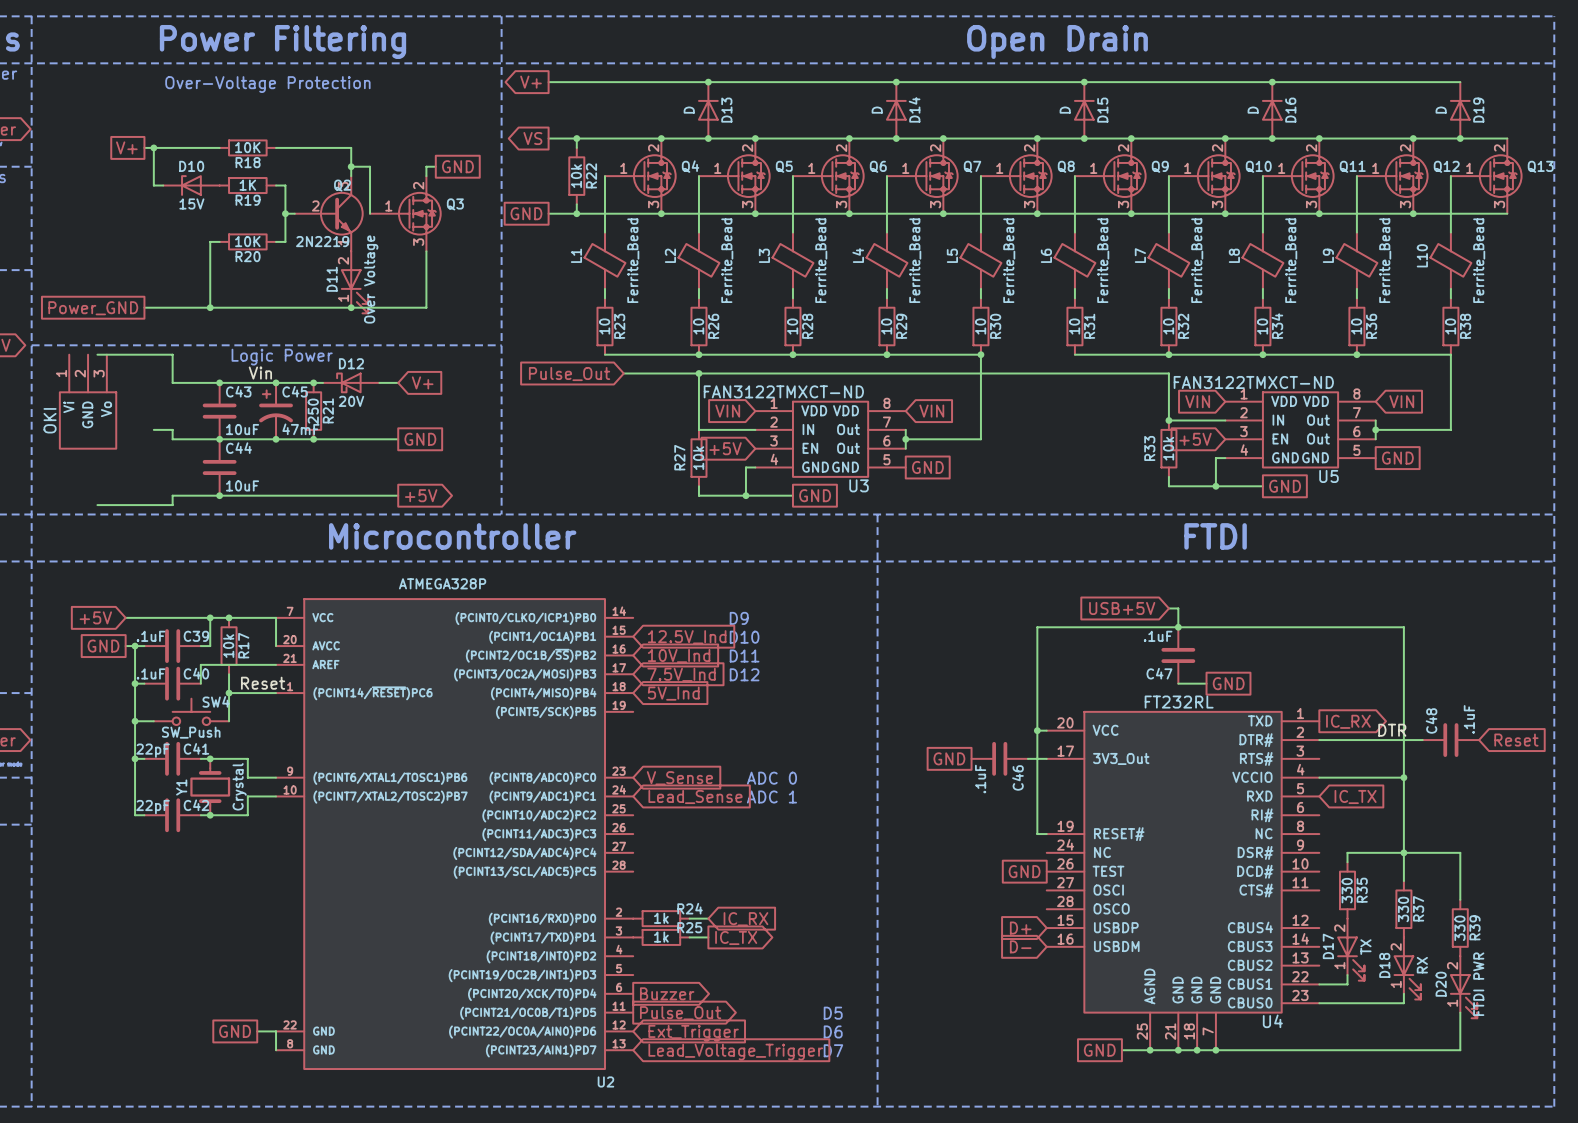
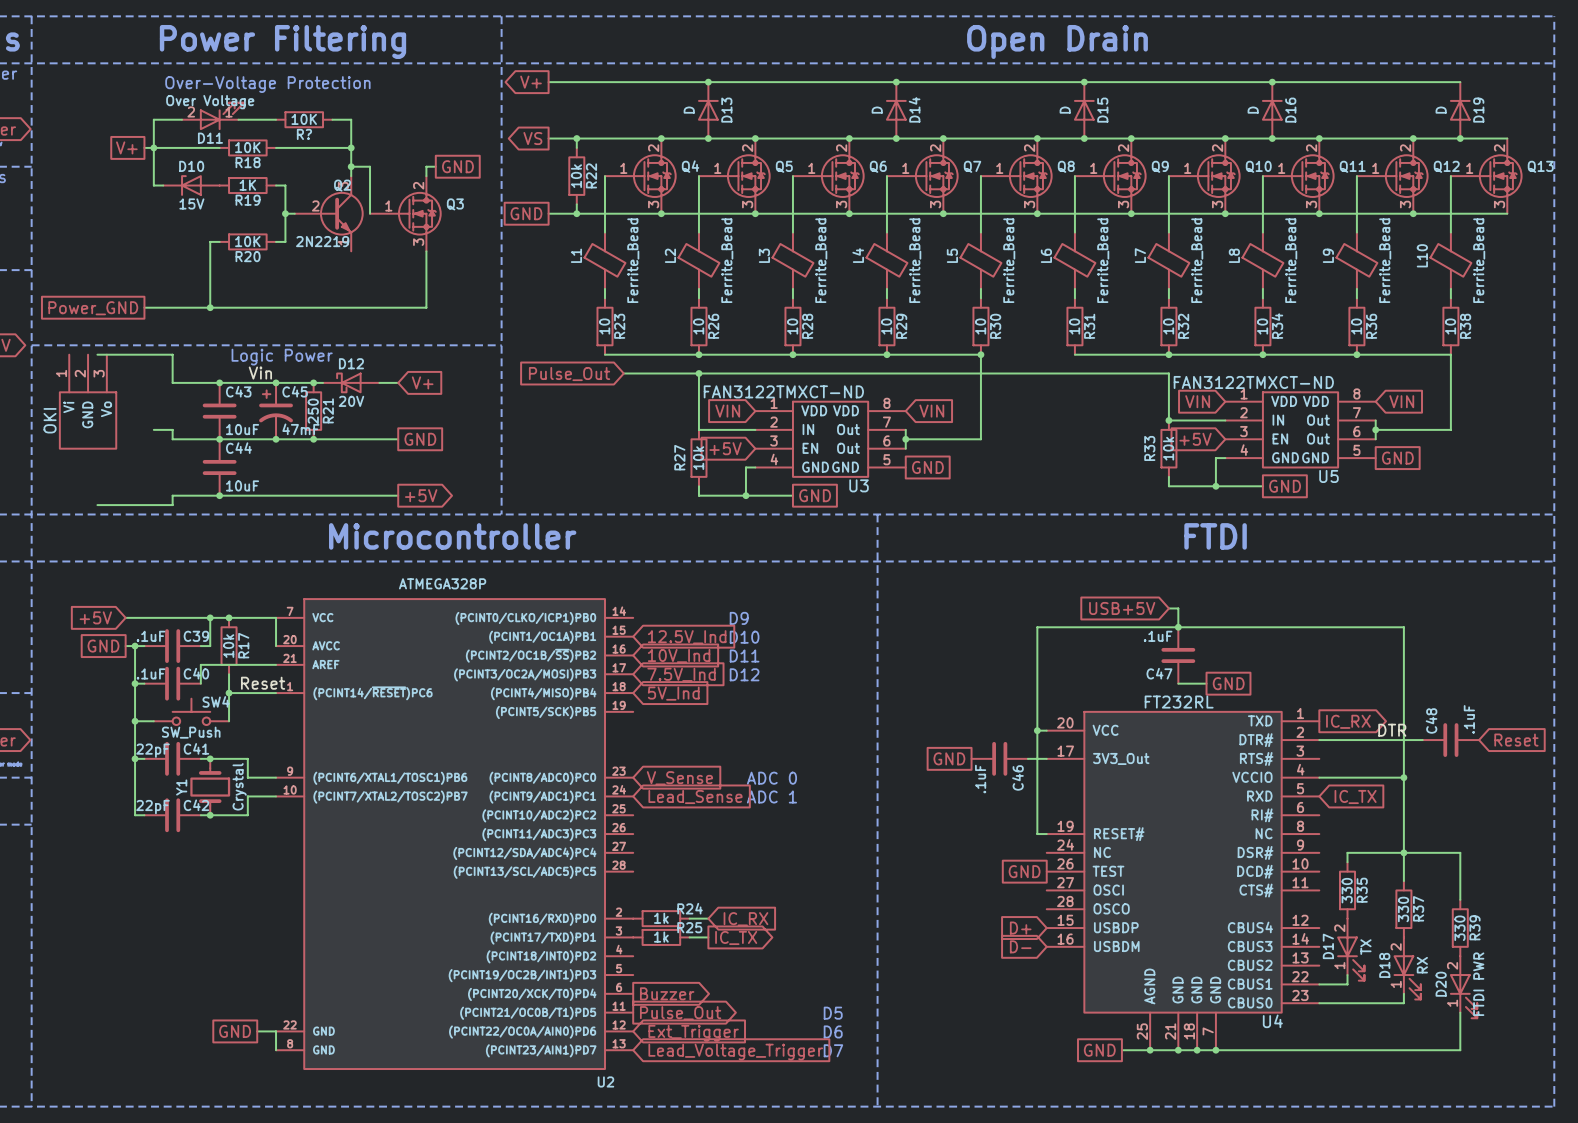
wire: none -> (182, 119) (153, 119) (153, 147)
wire: none -> (238, 119) (276, 119)
R?: none -> 10K (304, 119)
wire: none -> (332, 119) (351, 119) (351, 147)
junction: none -> (351, 147)
D11 position: (354, 282) -> (213, 116)
D11 rotation: 0° (354, 291) -> 90° counterclockwise (222, 116)
junction: (351, 307) -> none

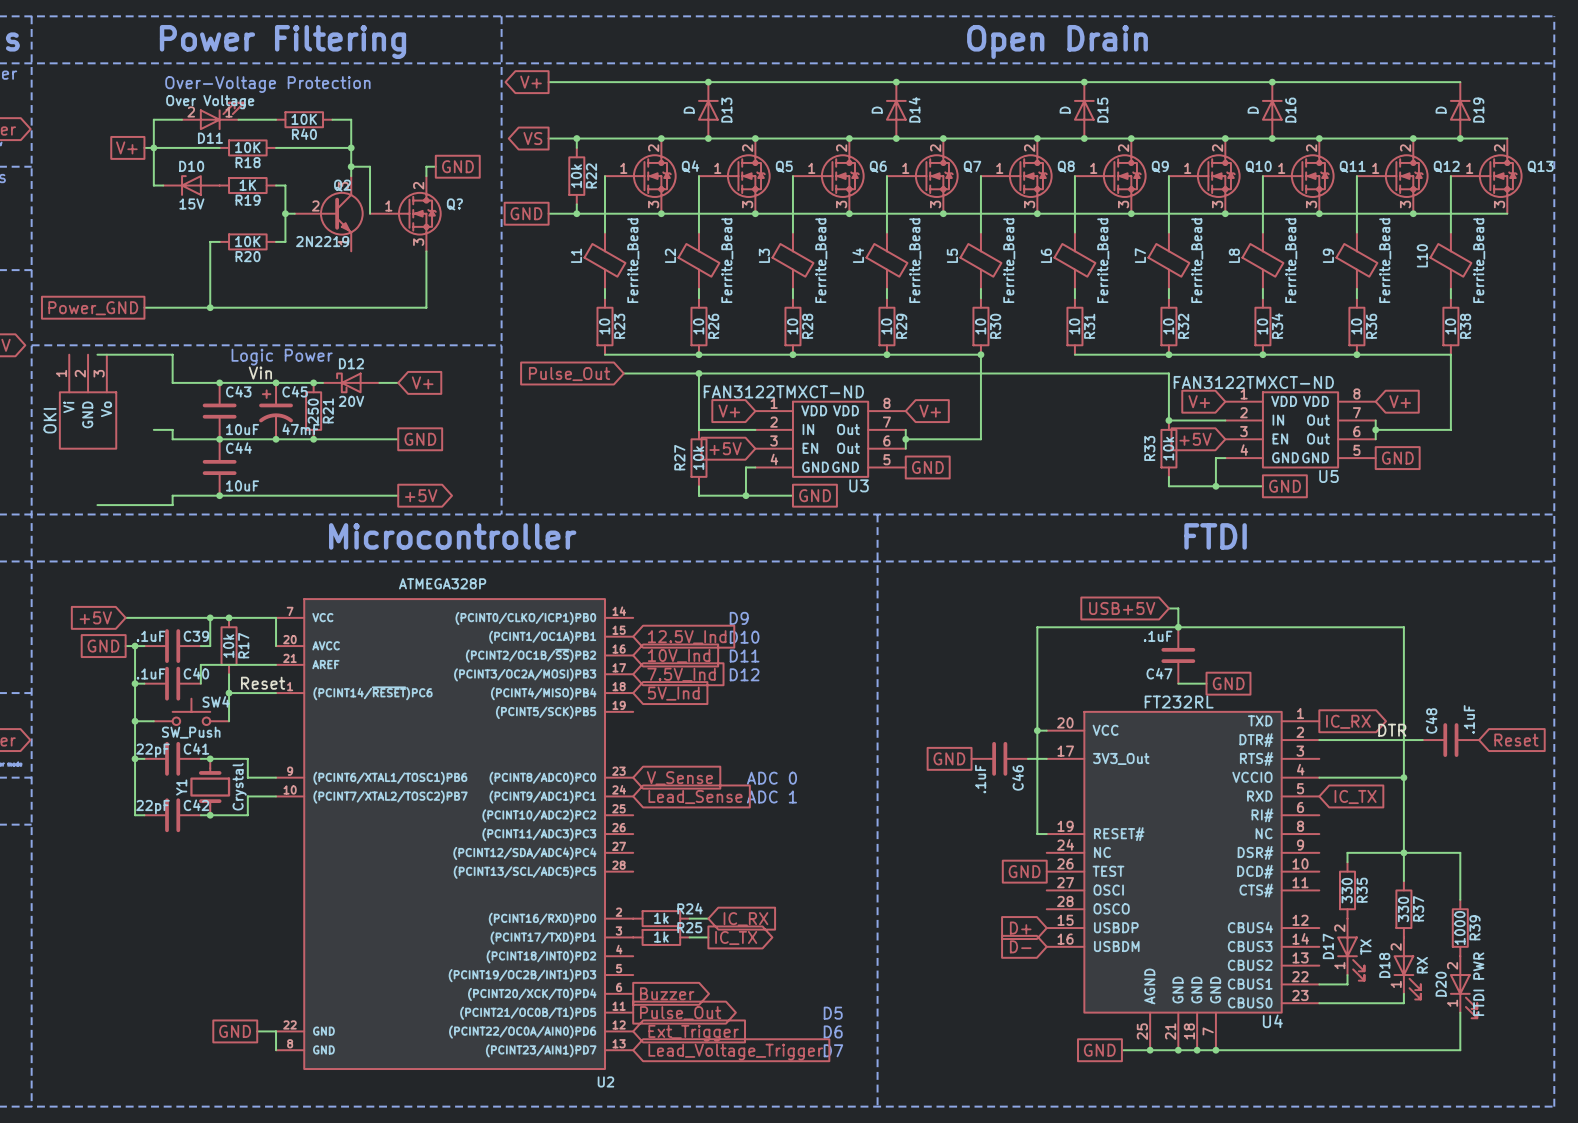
R? name: R? (304, 134) -> R40 (304, 134)
Q3 name: Q3 (455, 204) -> Q? (454, 204)
global label: VIN (1197, 401) -> V+ (1199, 401)
global label: VIN (1401, 401) -> V+ (1400, 401)
global label: VIN (727, 411) -> V+ (729, 411)
global label: VIN (931, 411) -> V+ (930, 411)
R39 value: 330 (1459, 928) -> 1000 (1459, 928)

